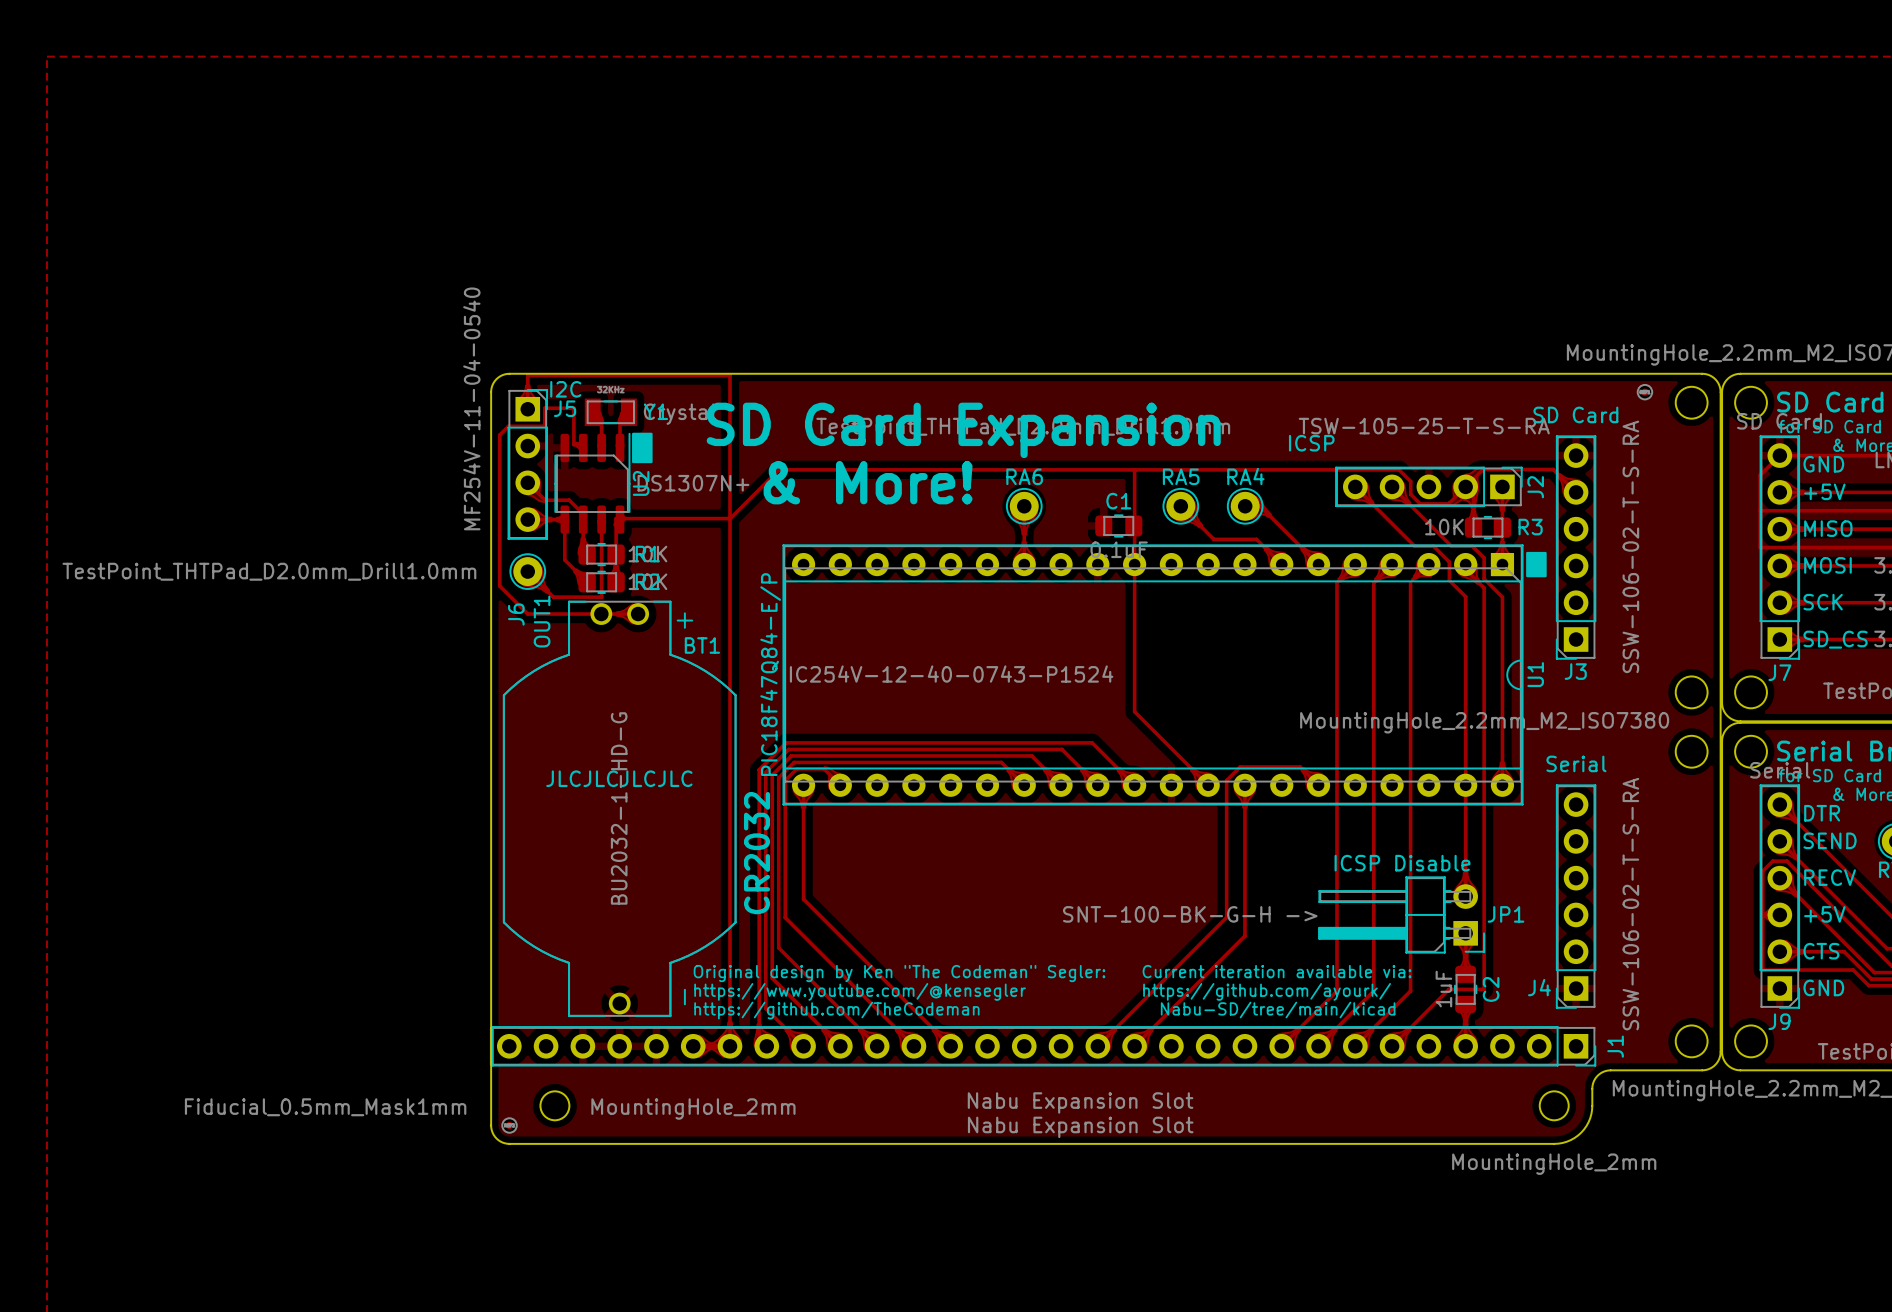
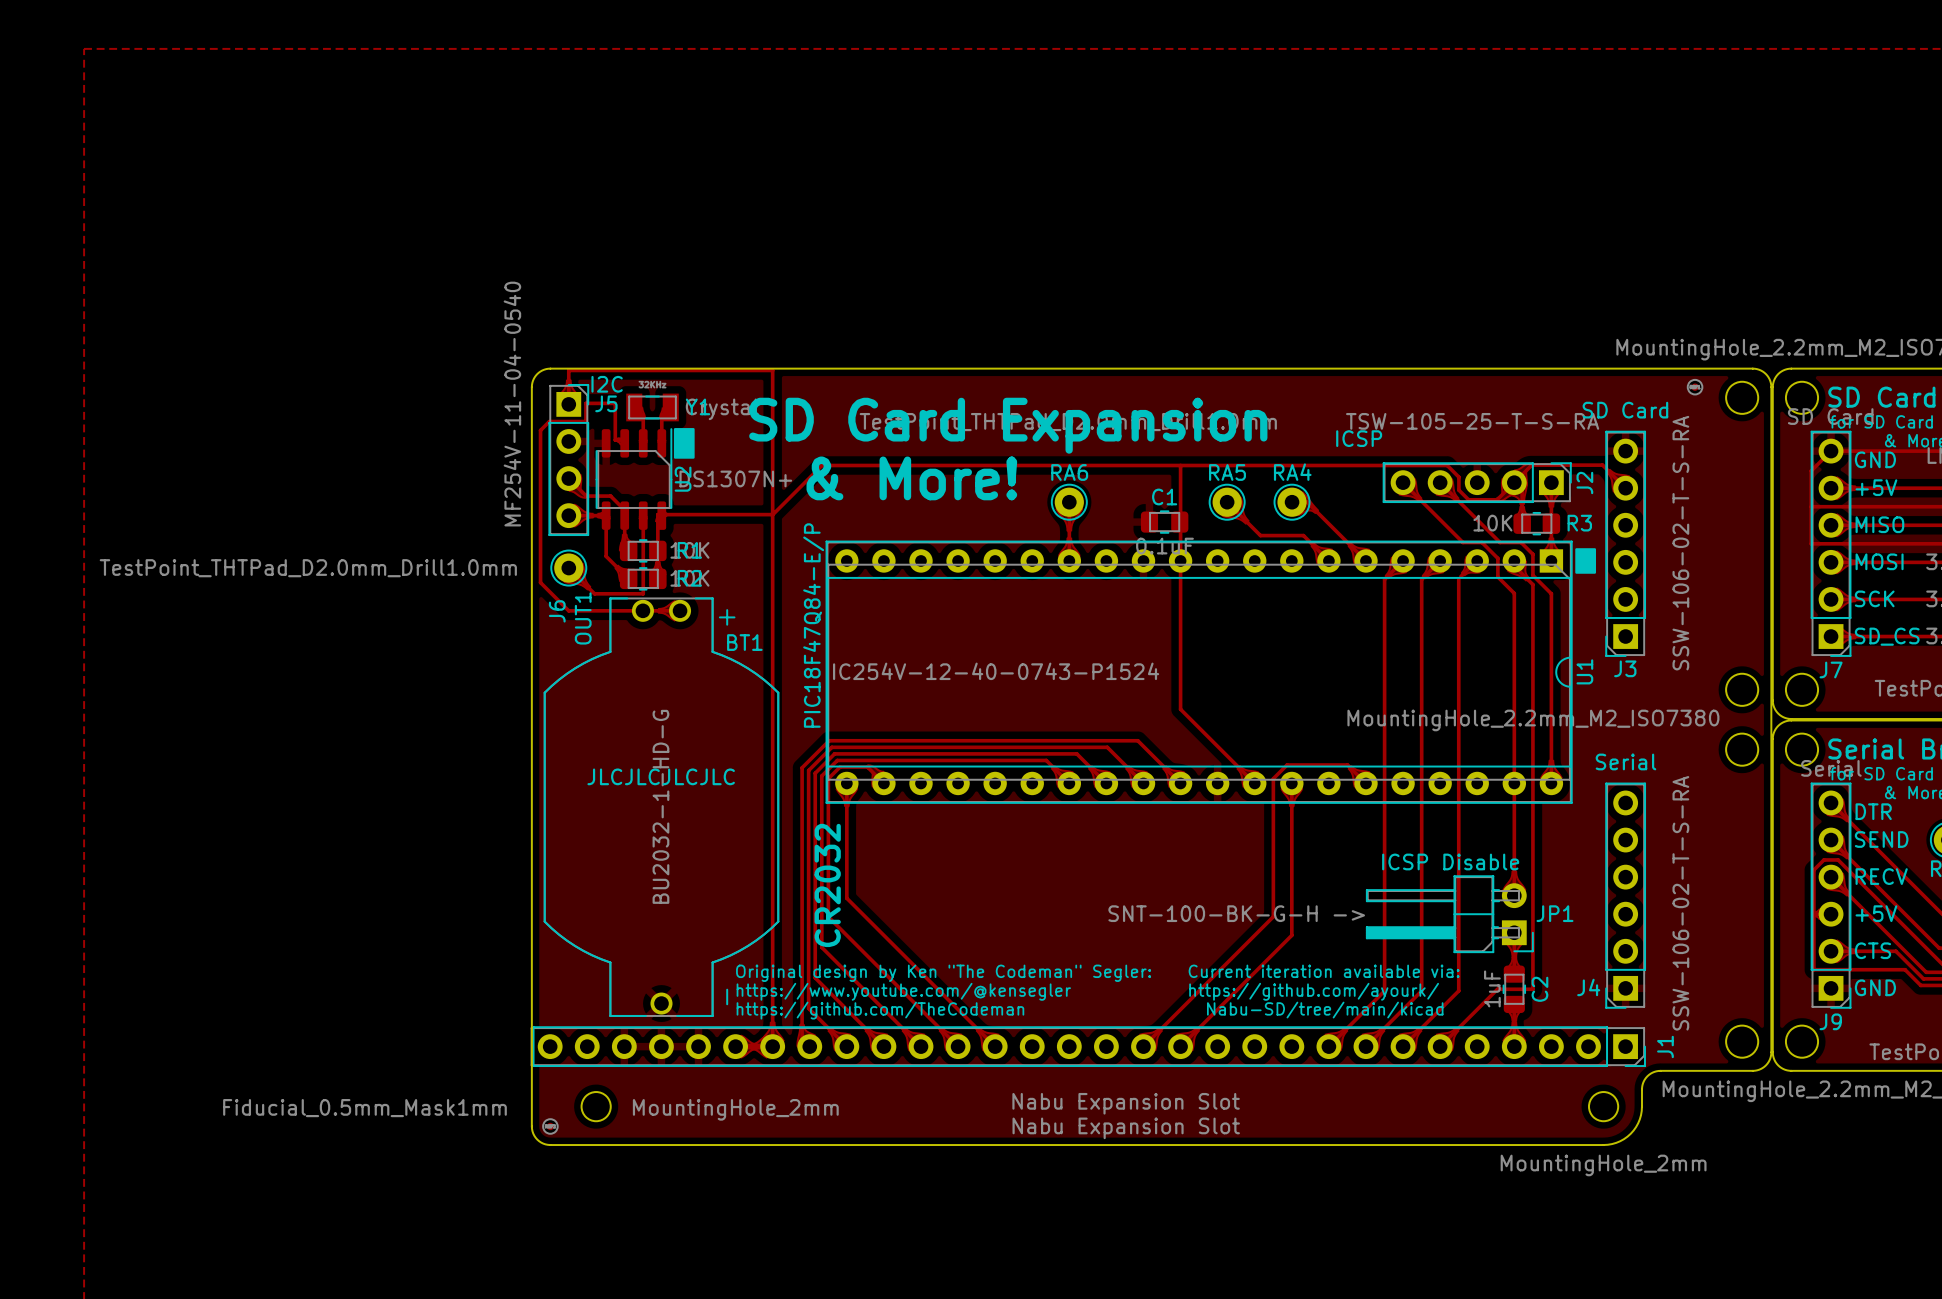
U1 value position: PIC18F47Q84-E/P (770, 674) -> PIC18F47Q84-E/P (813, 625)
text position: CR2032 (756, 853) -> CR2032 (827, 885)

